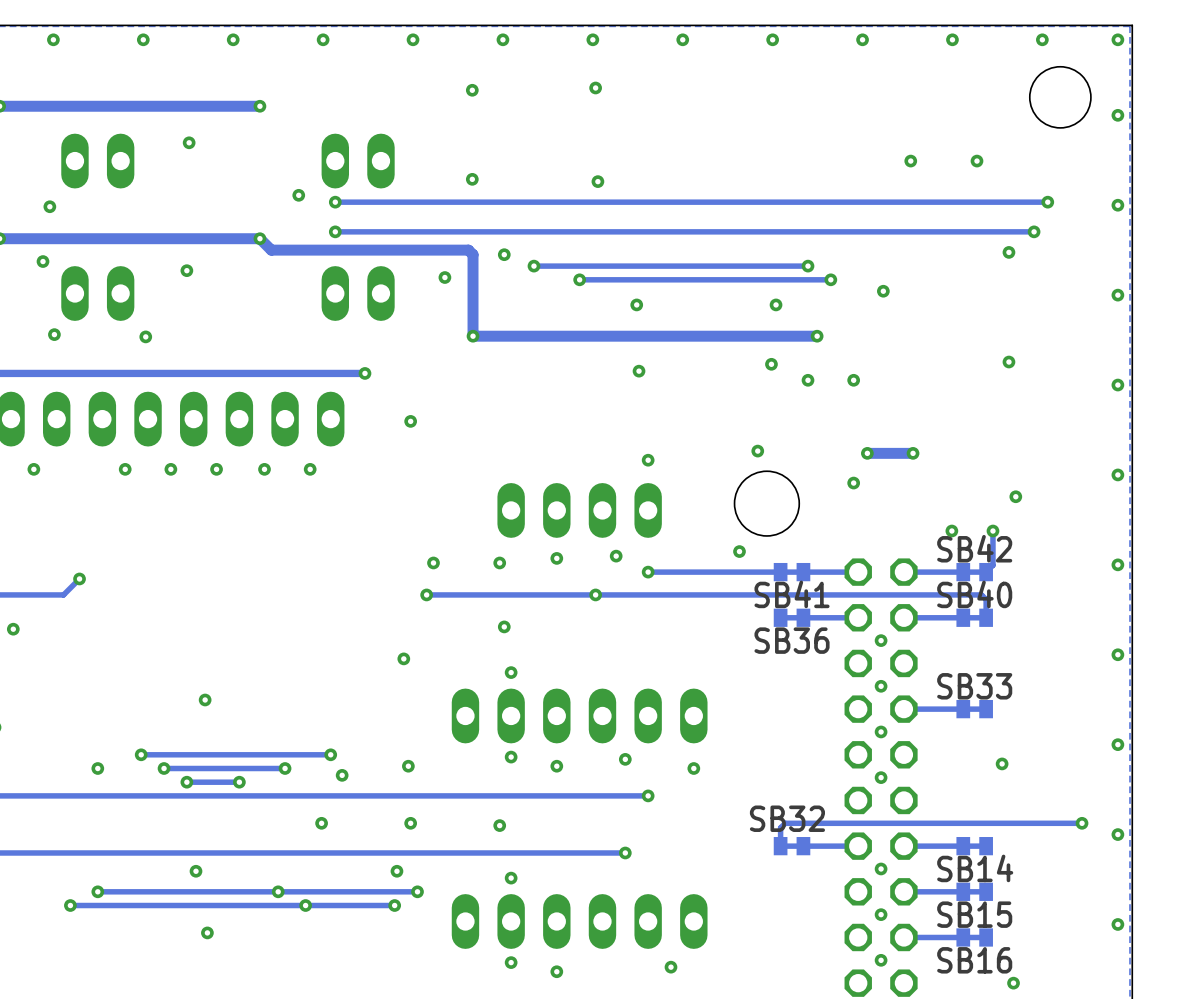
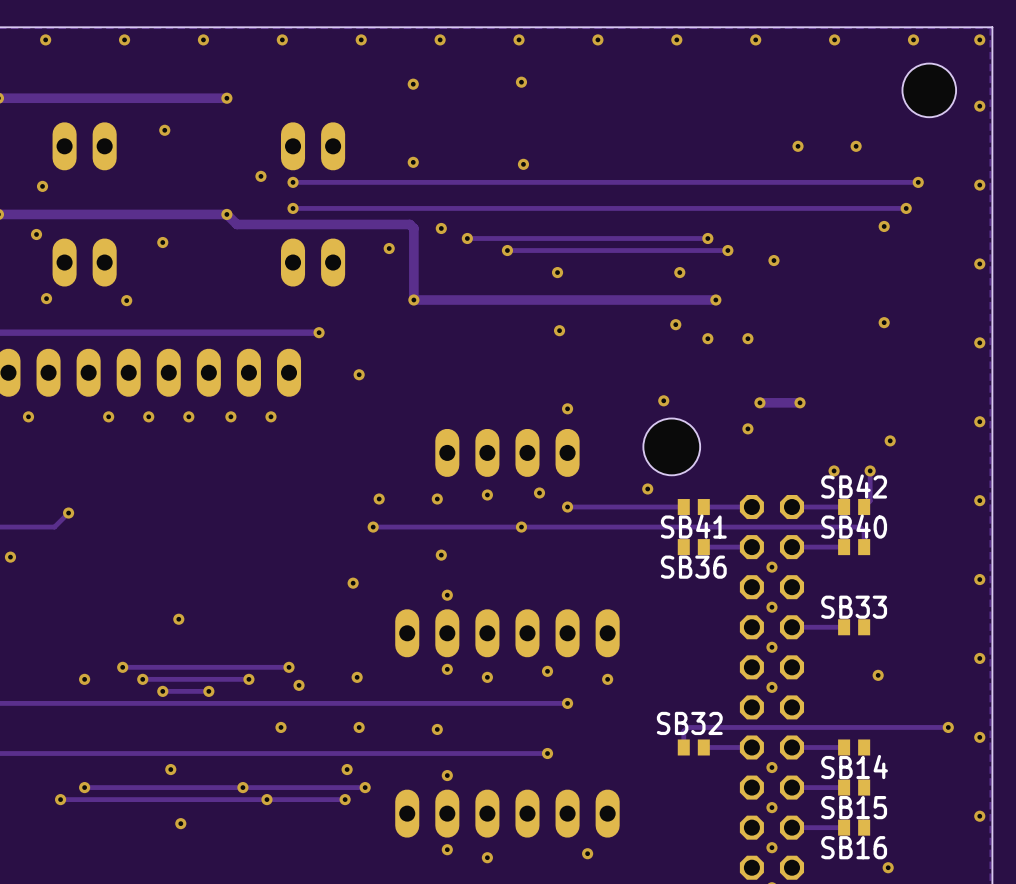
SB41 footprint: [773, 562, 811, 582] -> [677, 499, 710, 516]
SB42 footprint: [956, 562, 993, 582] -> [838, 499, 871, 516]
SB36 footprint: [773, 608, 811, 627] -> [677, 539, 710, 556]
SB40 footprint: [956, 608, 993, 627] -> [838, 539, 871, 556]
SB33 footprint: [956, 699, 993, 719] -> [838, 619, 871, 636]
SB32 footprint: [773, 837, 811, 856] -> [677, 739, 710, 756]
SB14 footprint: [956, 837, 993, 856] -> [838, 739, 871, 756]
SB15 footprint: [956, 882, 993, 901] -> [838, 779, 871, 796]
SB16 footprint: [956, 928, 993, 947] -> [838, 819, 871, 836]

